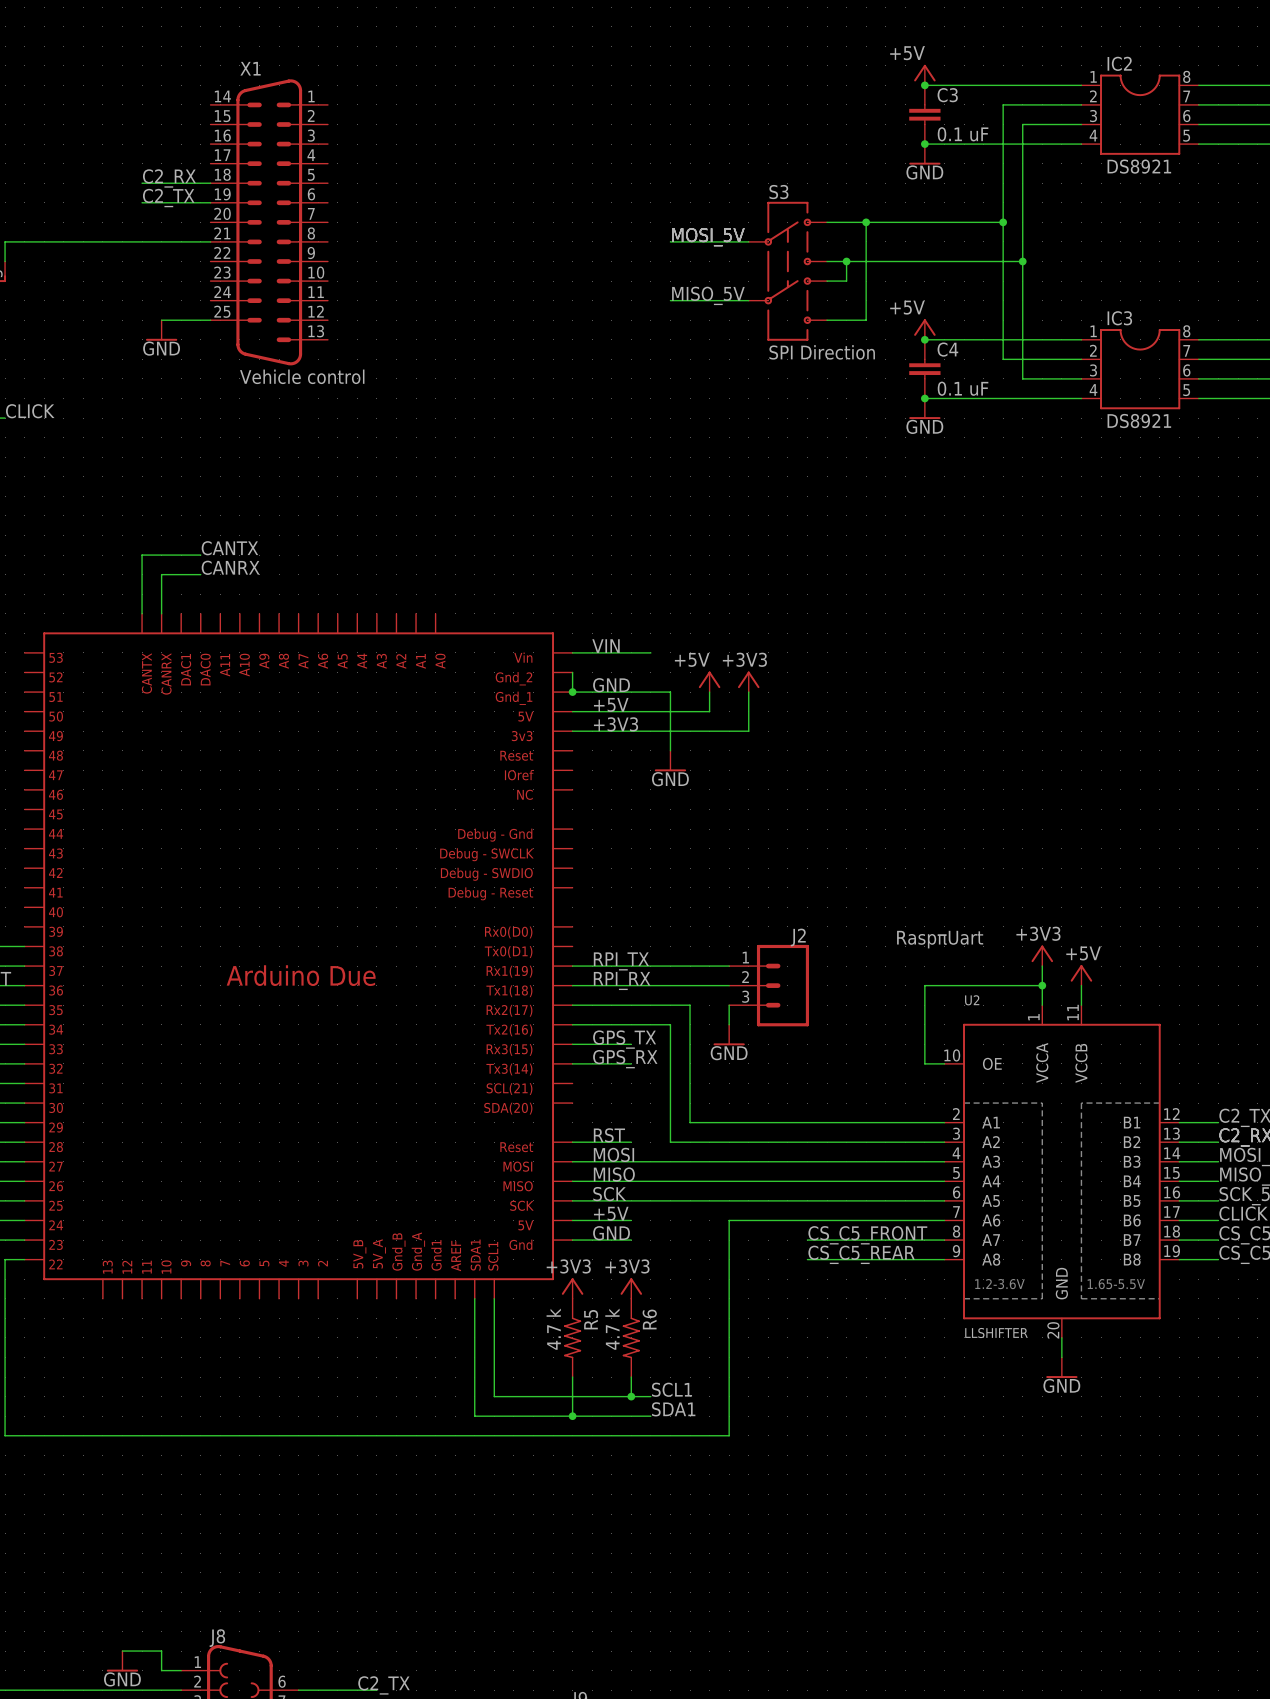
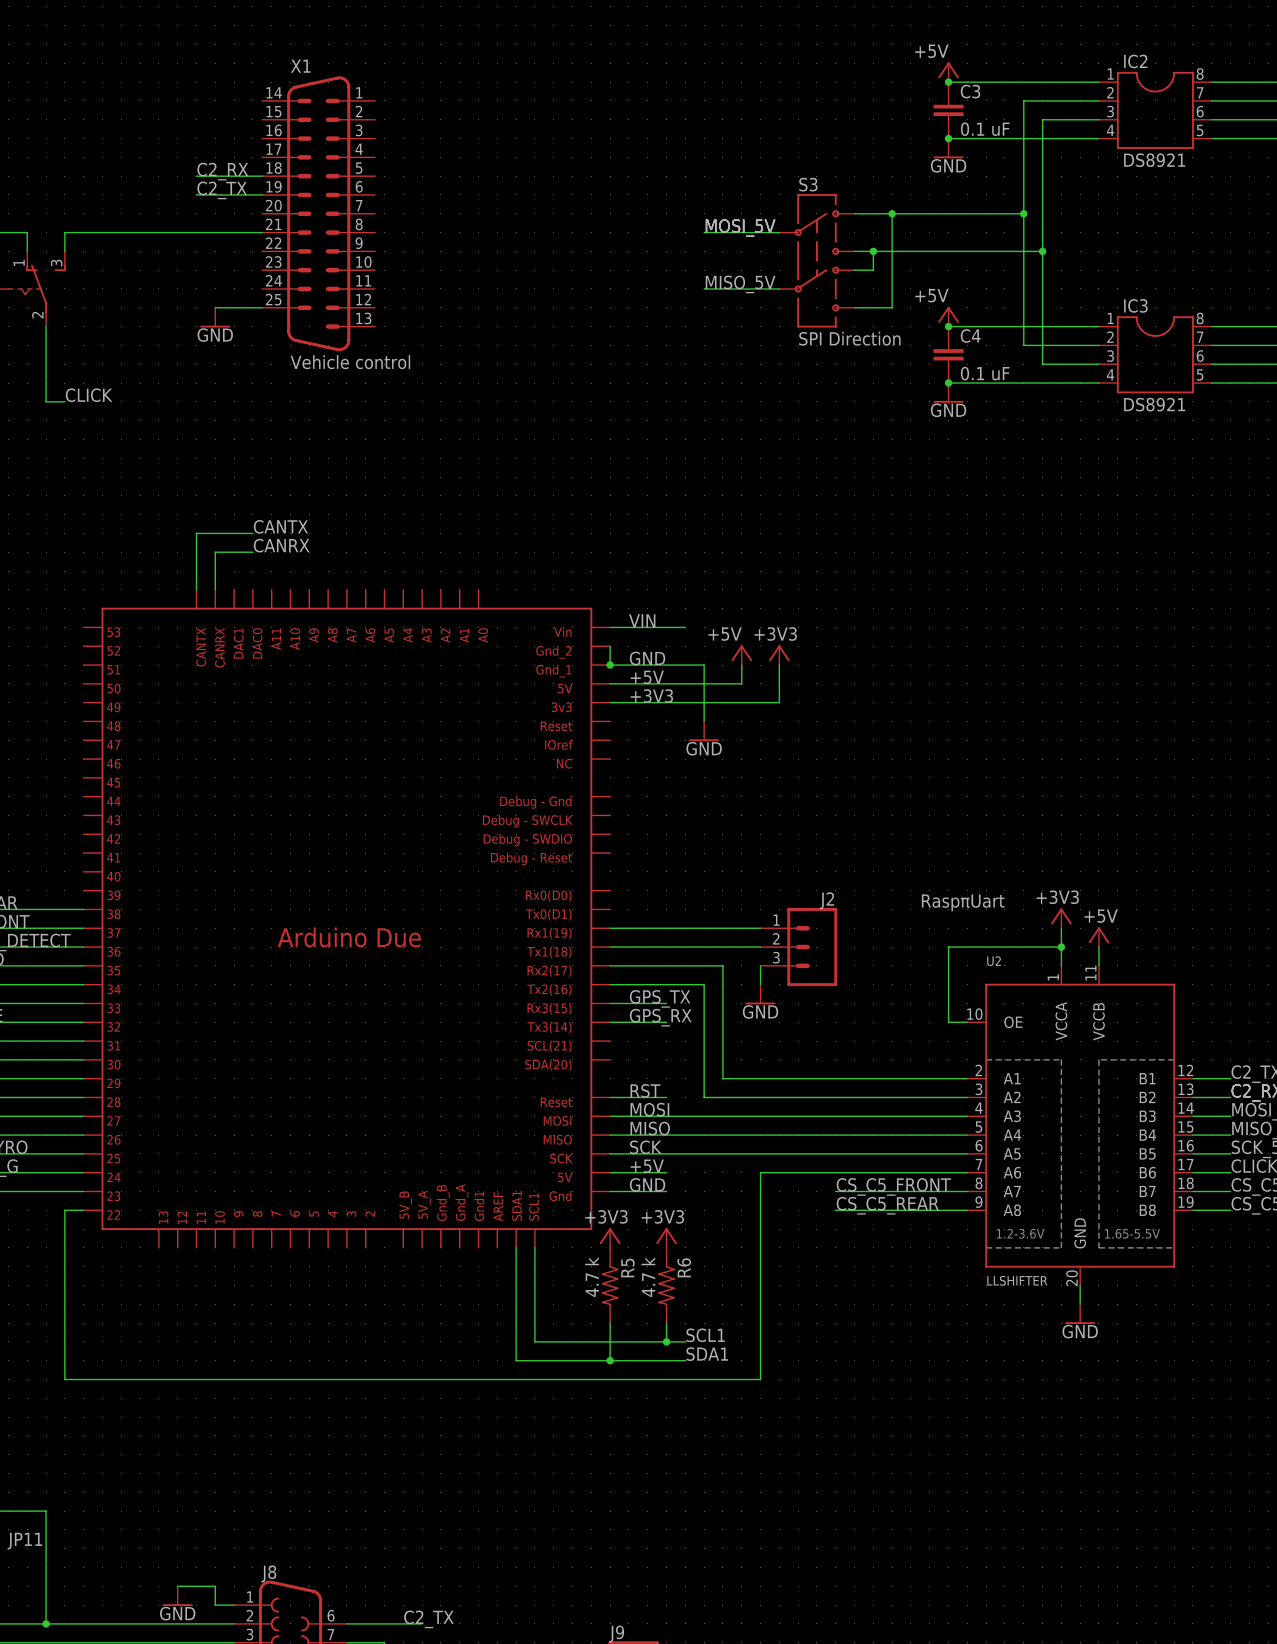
label: RPI_TX (621, 961) -> none
label: RPI_RX (622, 980) -> none

